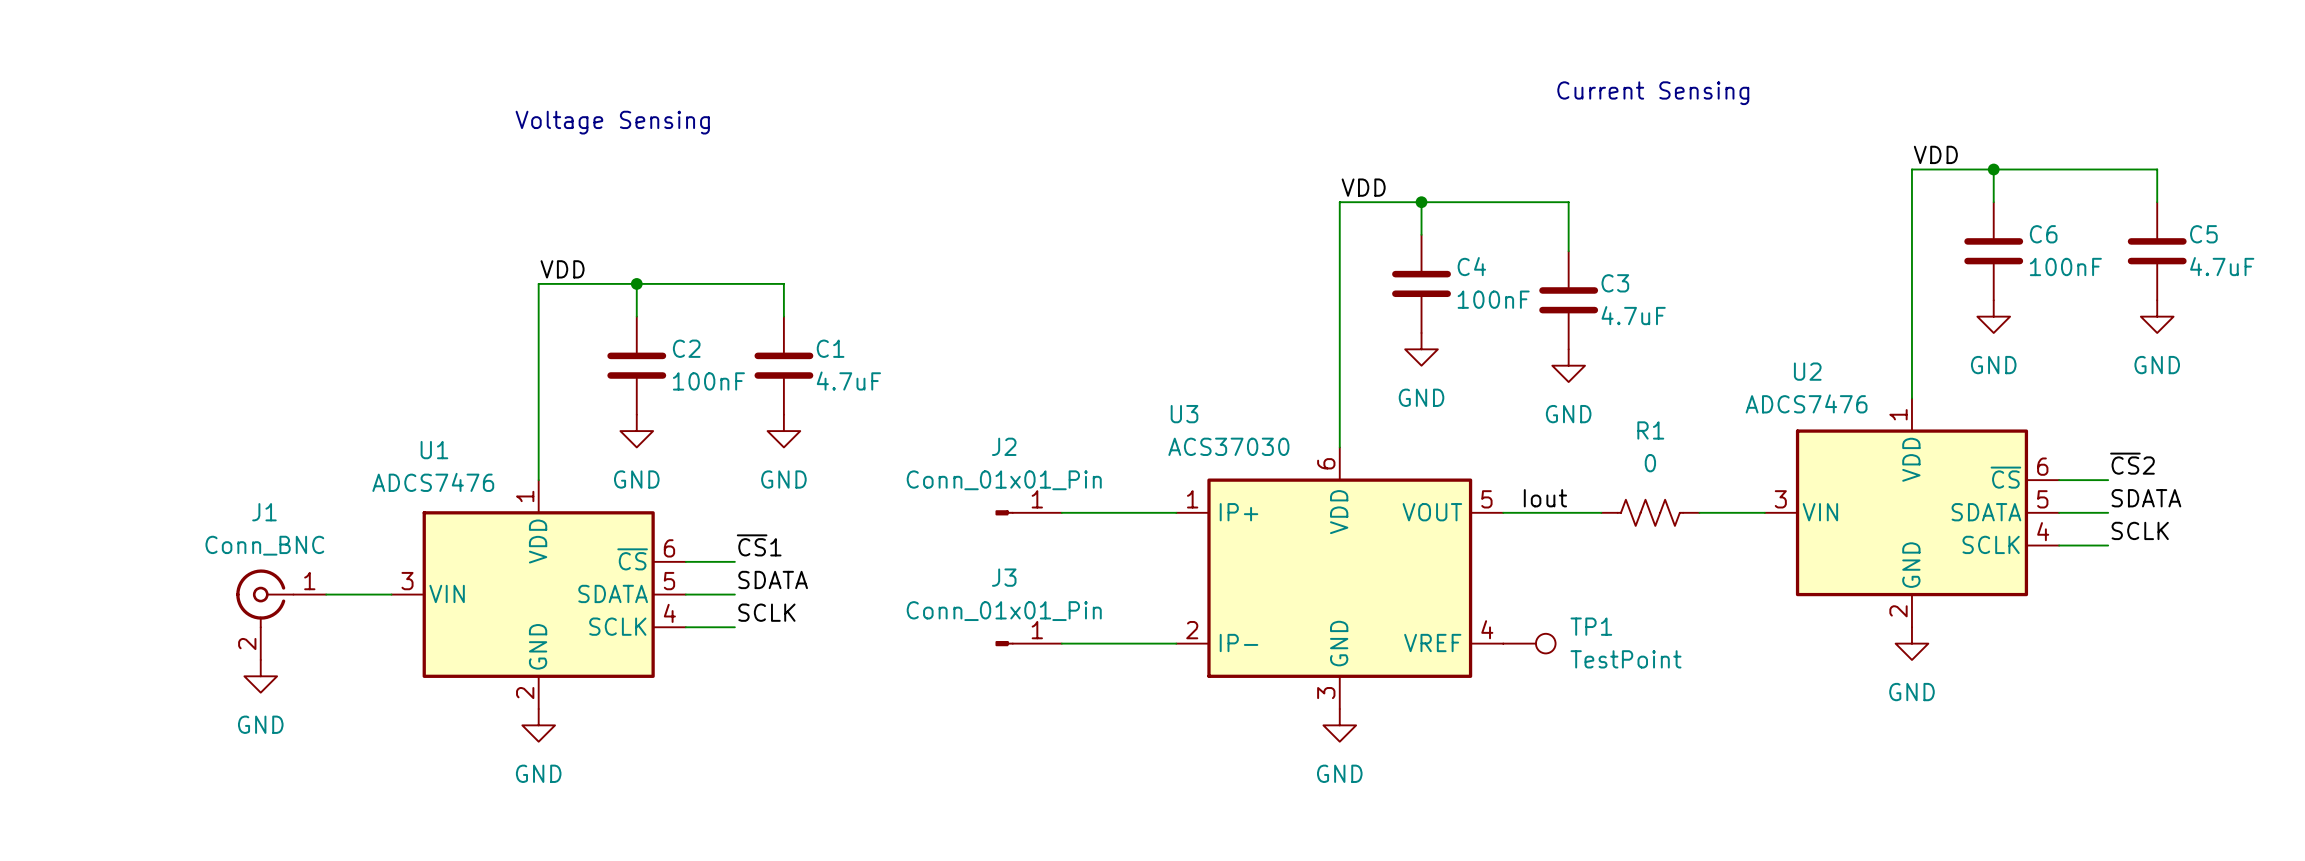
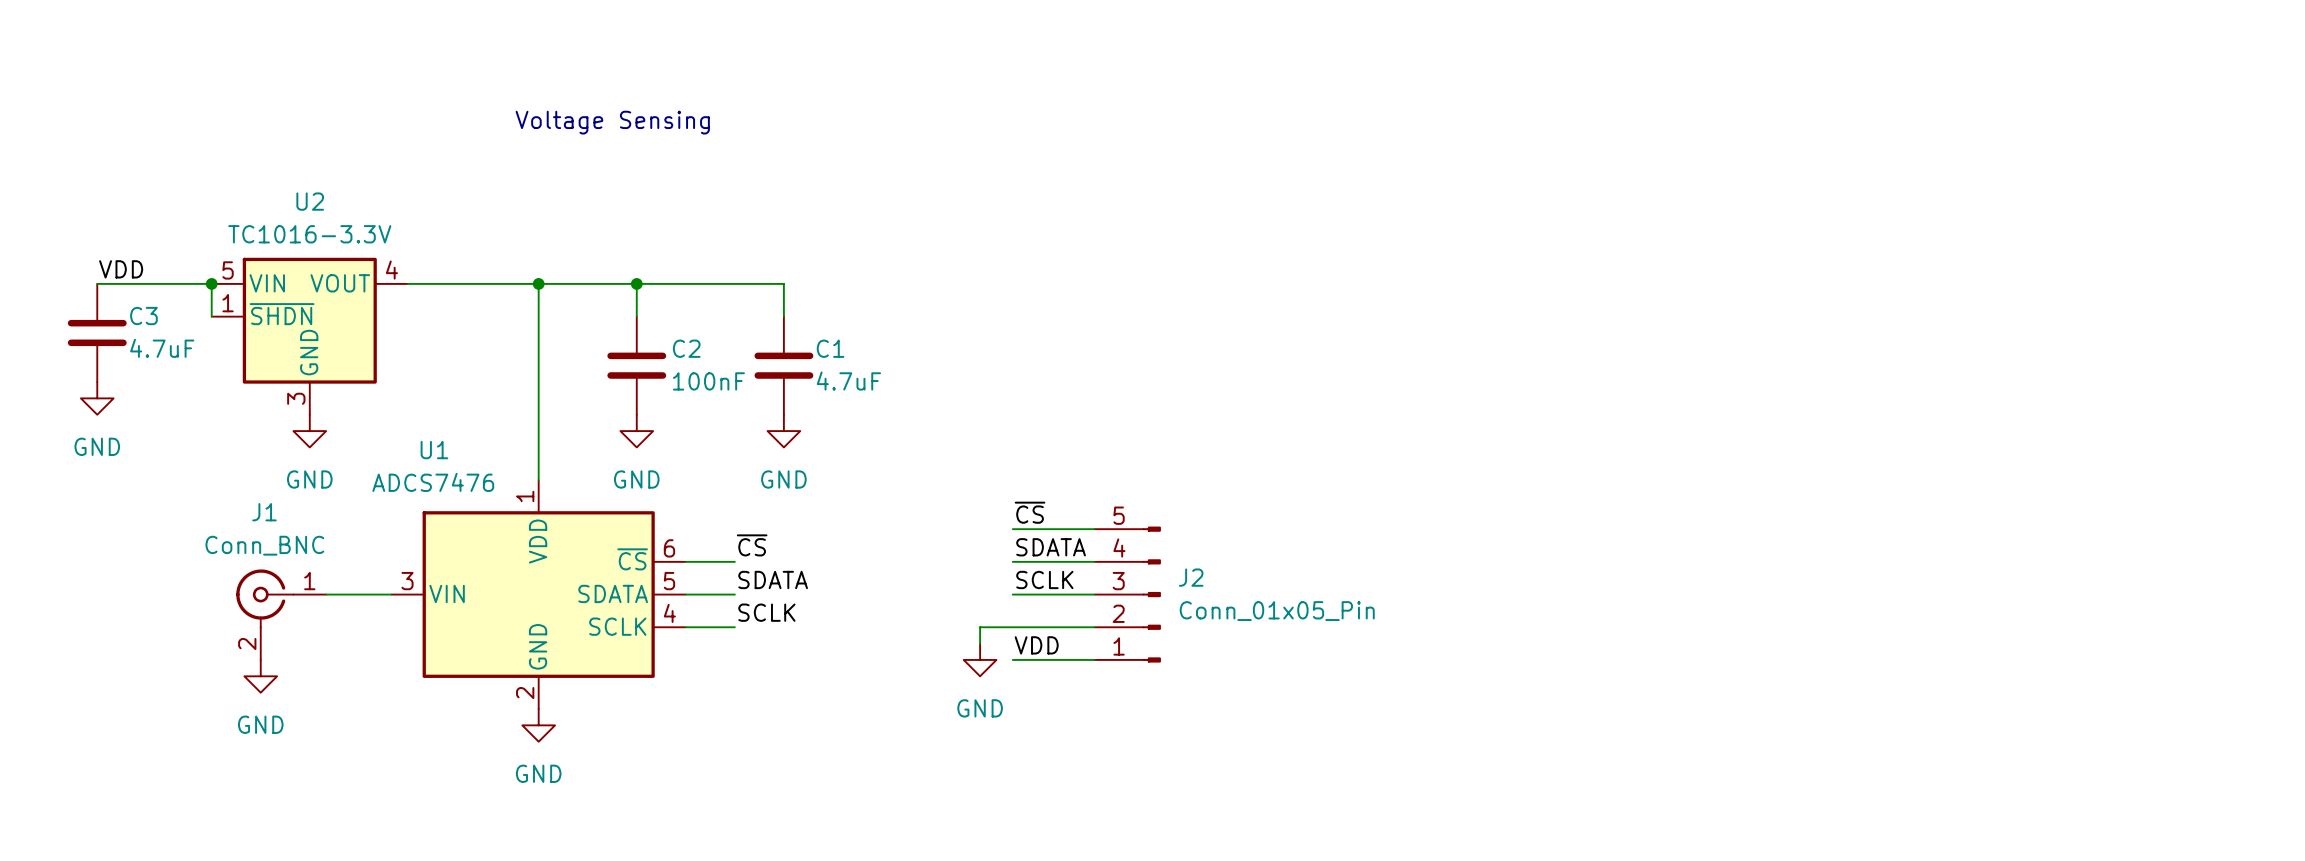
text: Current Sensing (1653, 93) -> none
label: VDD (1935, 154) -> none
wire: (1993, 169) (1993, 202) -> none
junction: (1993, 169) -> none
label: VDD (1363, 187) -> none
wire: (1421, 202) (1421, 234) -> none
junction: (1421, 202) -> none
wire: (2157, 202) (2157, 169) (1911, 169) (1911, 398) -> none
wire: (1568, 251) (1568, 202) (1339, 202) (1339, 447) -> none
C6: 100nF (1993, 251) -> none
C5: 4.7uF (2157, 251) -> none
label: none -> VDD (121, 269)
label: VDD (562, 269) -> none
wire: none -> (97, 283) (211, 283) (211, 316)
junction: none -> (211, 283)
wire: none -> (407, 283) (538, 283)
junction: none -> (538, 283)
C4: 100nF (1421, 283) -> none
C3 position: (1568, 300) -> (97, 332)
power symbol: GND (1993, 316) -> none
power symbol: GND (2157, 316) -> none
power symbol: GND (1421, 349) -> none
power symbol: GND (1568, 365) -> none
U2 name position: U2 (1807, 371) -> U2 (310, 201)
power symbol: none -> GND (97, 398)
U2 symbol: [1764, 398, 2060, 628] -> [211, 257, 408, 415]
U2 value: ADCS7476 (1806, 403) -> TC1016-3.3V (309, 234)
power symbol: none -> GND (309, 431)
J2 name position: J2 (1004, 446) -> J2 (1191, 577)
label: ~{CS}2 (2132, 463) -> none
J2 value: Conn_01x01_Pin (1004, 480) -> Conn_01x05_Pin (1277, 611)
wire: (2059, 480) (2108, 480) -> none
label: Iout (1545, 498) -> none
label: SDATA (2146, 498) -> none
J2 symbol: [995, 510, 1062, 516] -> [1094, 526, 1161, 663]
label: none -> ~{CS} (1030, 512)
wire: (1061, 512) (1176, 512) -> none
wire: (1503, 512) (1601, 512) -> none
R1: 0 (1650, 512) -> none
wire: (1699, 512) (1764, 512) -> none
wire: (2059, 512) (2108, 512) -> none
wire: none -> (1012, 529) (1094, 529)
label: SCLK (2140, 530) -> none
label: ~{CS}1 (759, 545) -> ~{CS} (752, 545)
wire: (2059, 545) (2108, 545) -> none
label: none -> SDATA (1051, 547)
wire: none -> (1012, 561) (1094, 561)
U3: ACS37030 (1339, 578) -> none
label: none -> SCLK (1044, 579)
wire: none -> (1012, 594) (1094, 594)
wire: none -> (1094, 627) (980, 627) (980, 643)
J3: Conn_01x01_Pin (1028, 643) -> none
wire: (1061, 643) (1176, 643) -> none
TP1: TestPoint (1529, 643) -> none
power symbol: GND (1911, 643) -> none
label: none -> VDD (1036, 645)
power symbol: none -> GND (980, 659)
wire: none -> (1012, 659) (1094, 659)
power symbol: GND (1339, 725) -> none

